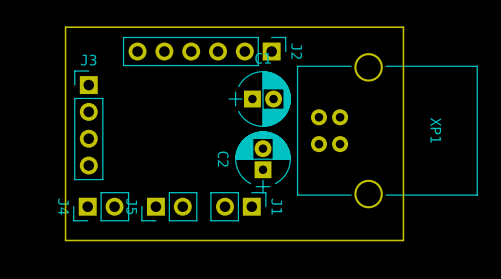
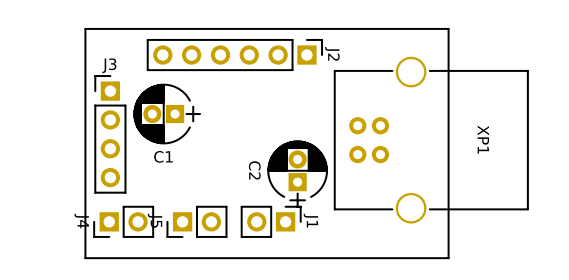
C1 rotation: 0° (259, 99) -> 180° (167, 114)
C1 position: (259, 99) -> (167, 114)

